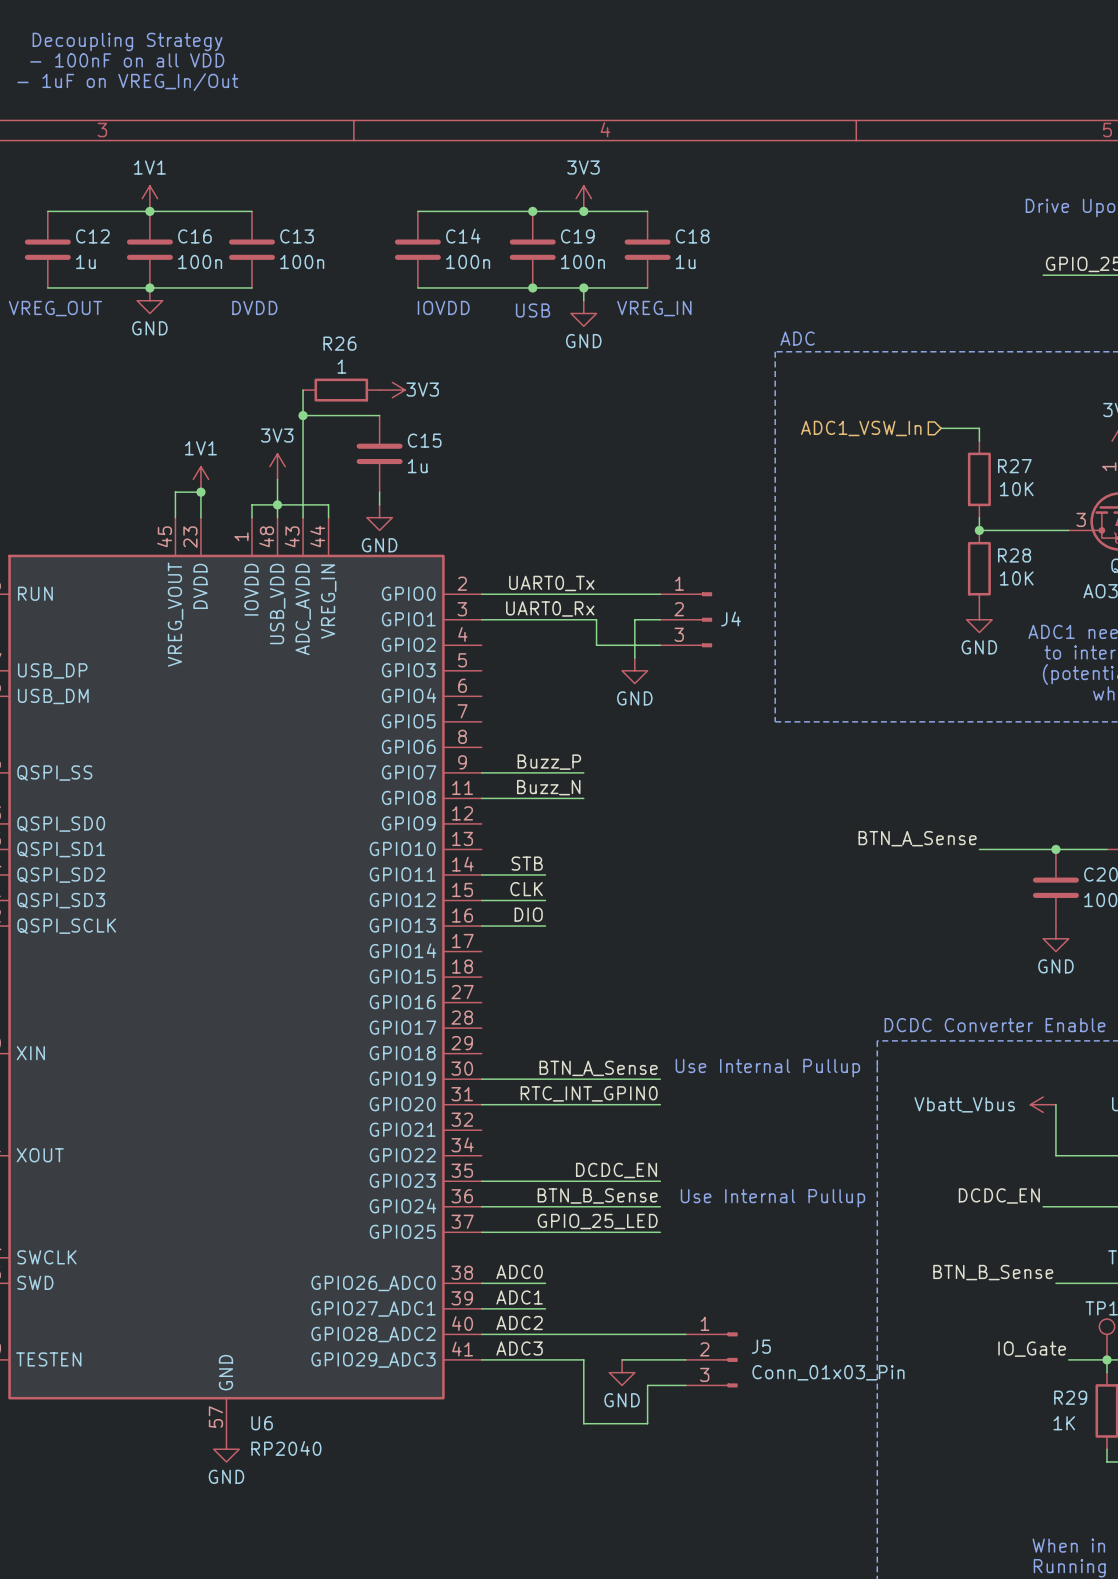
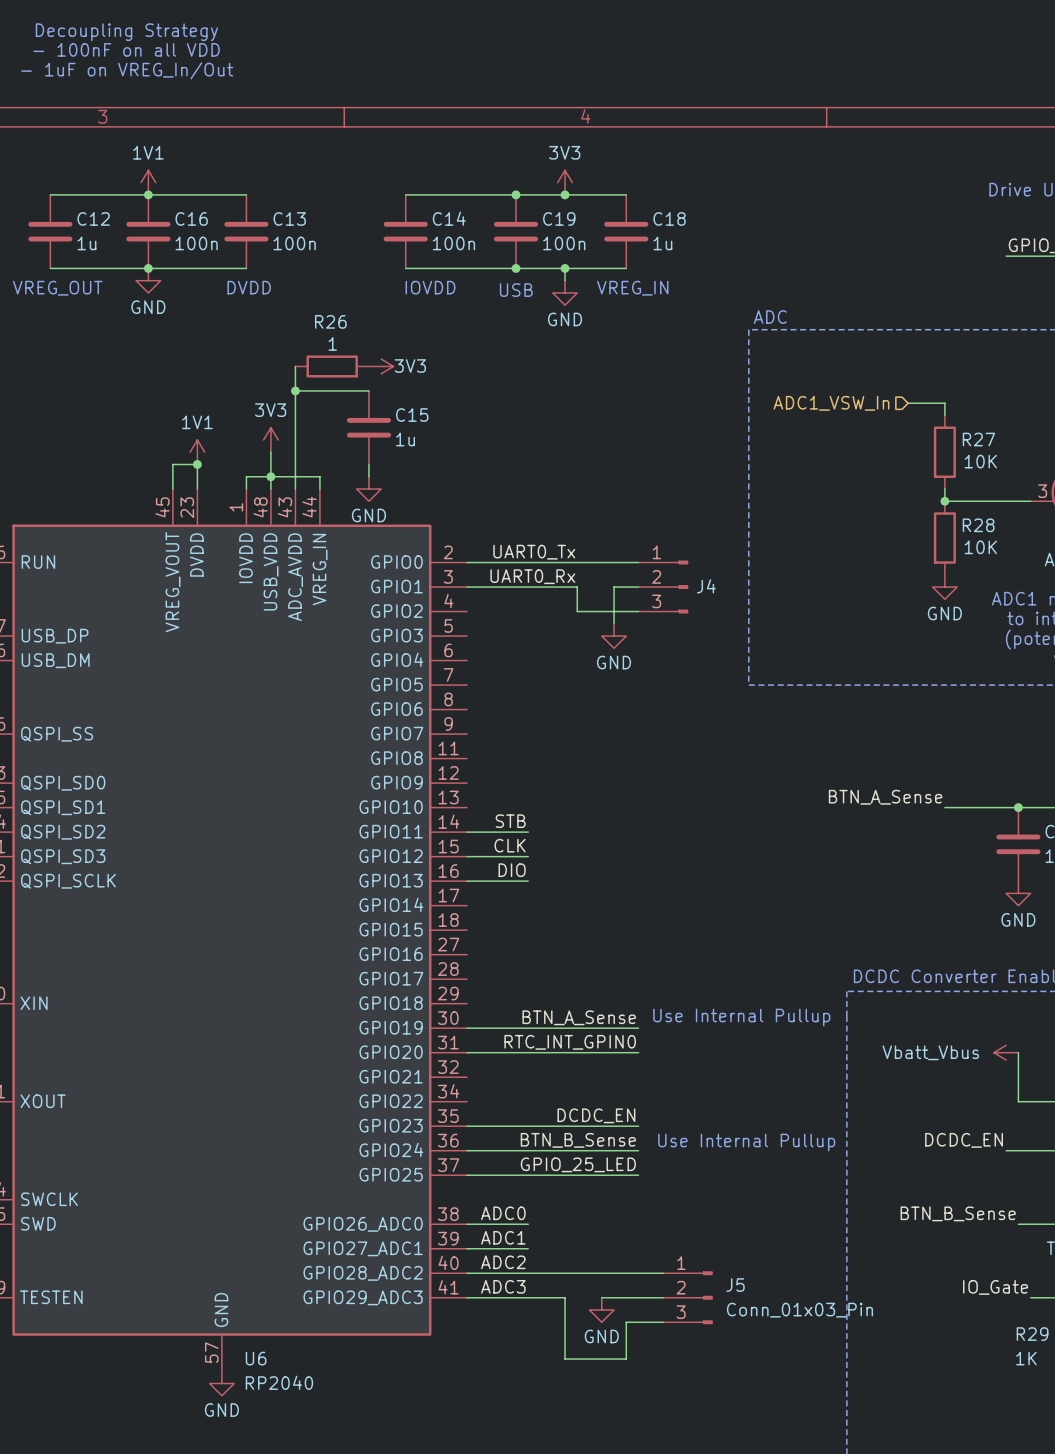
label: Buzz_P (549, 762) -> none
wire: (481, 772) (583, 772) -> none
label: Buzz_N (548, 787) -> none
wire: (481, 798) (583, 798) -> none

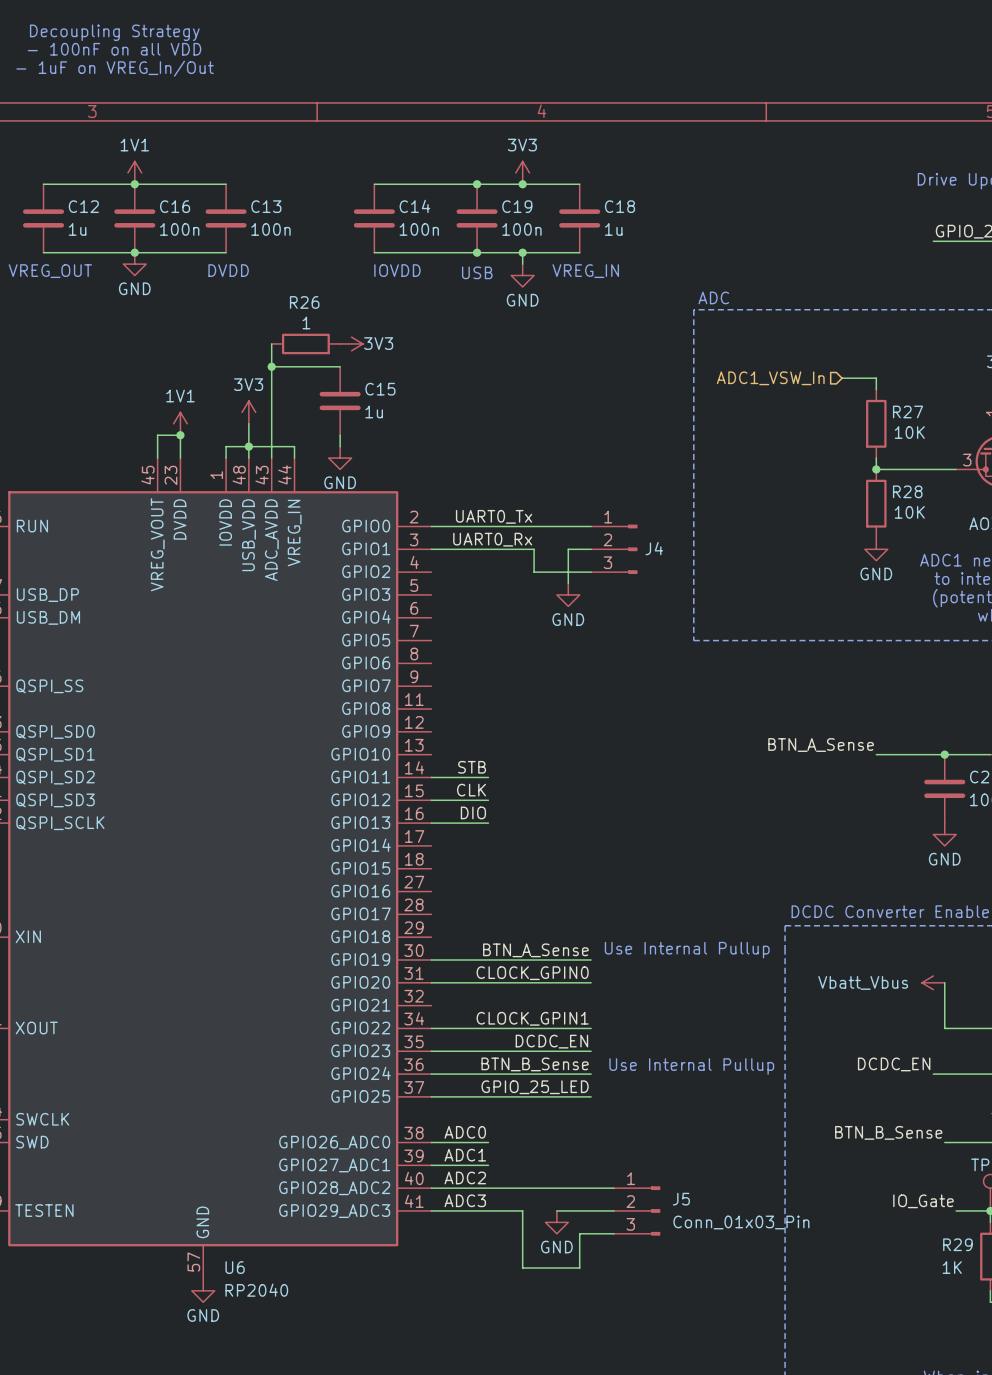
label: RTC_INT_GPIN0 (570, 1042) -> CLOCK_GPIN0 (532, 973)
label: none -> CLOCK_GPIN1 (532, 1018)
wire: none -> (431, 1028) (591, 1028)

